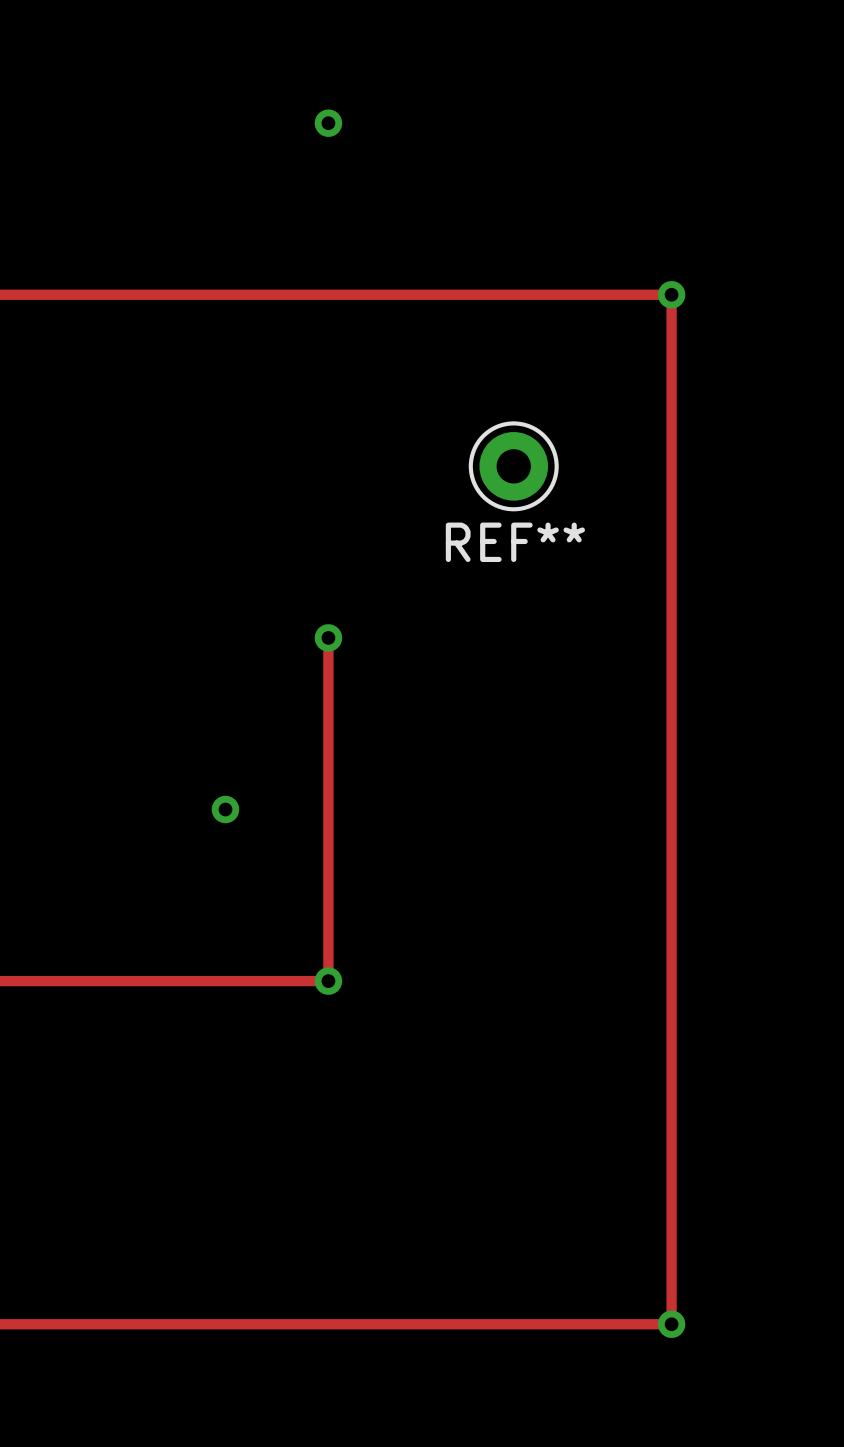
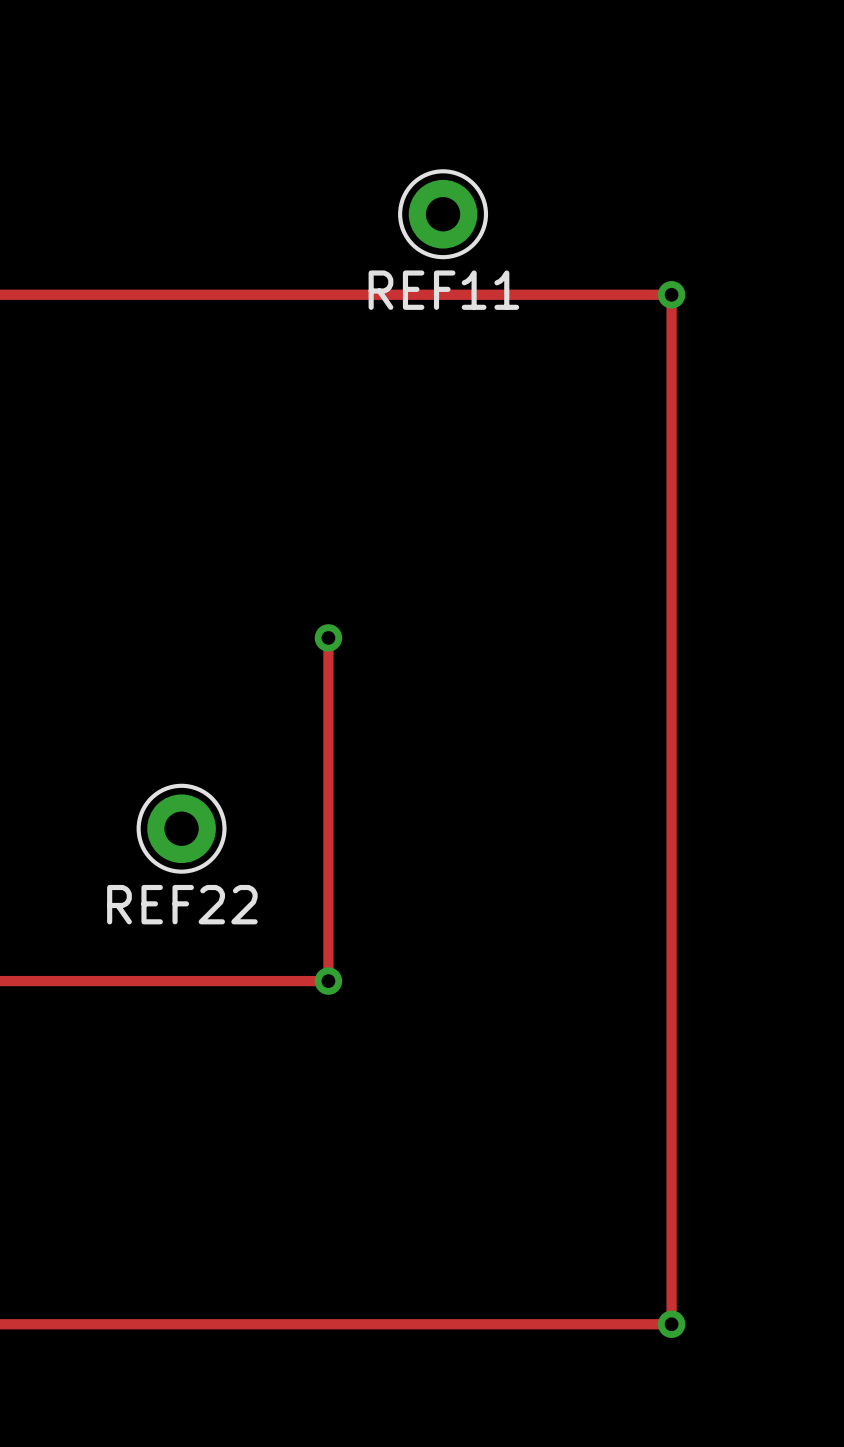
via: (328, 123) -> none
REF11: none -> (443, 214)
REF**: (513, 466) -> none
via: (225, 809) -> none
REF22: none -> (181, 828)

